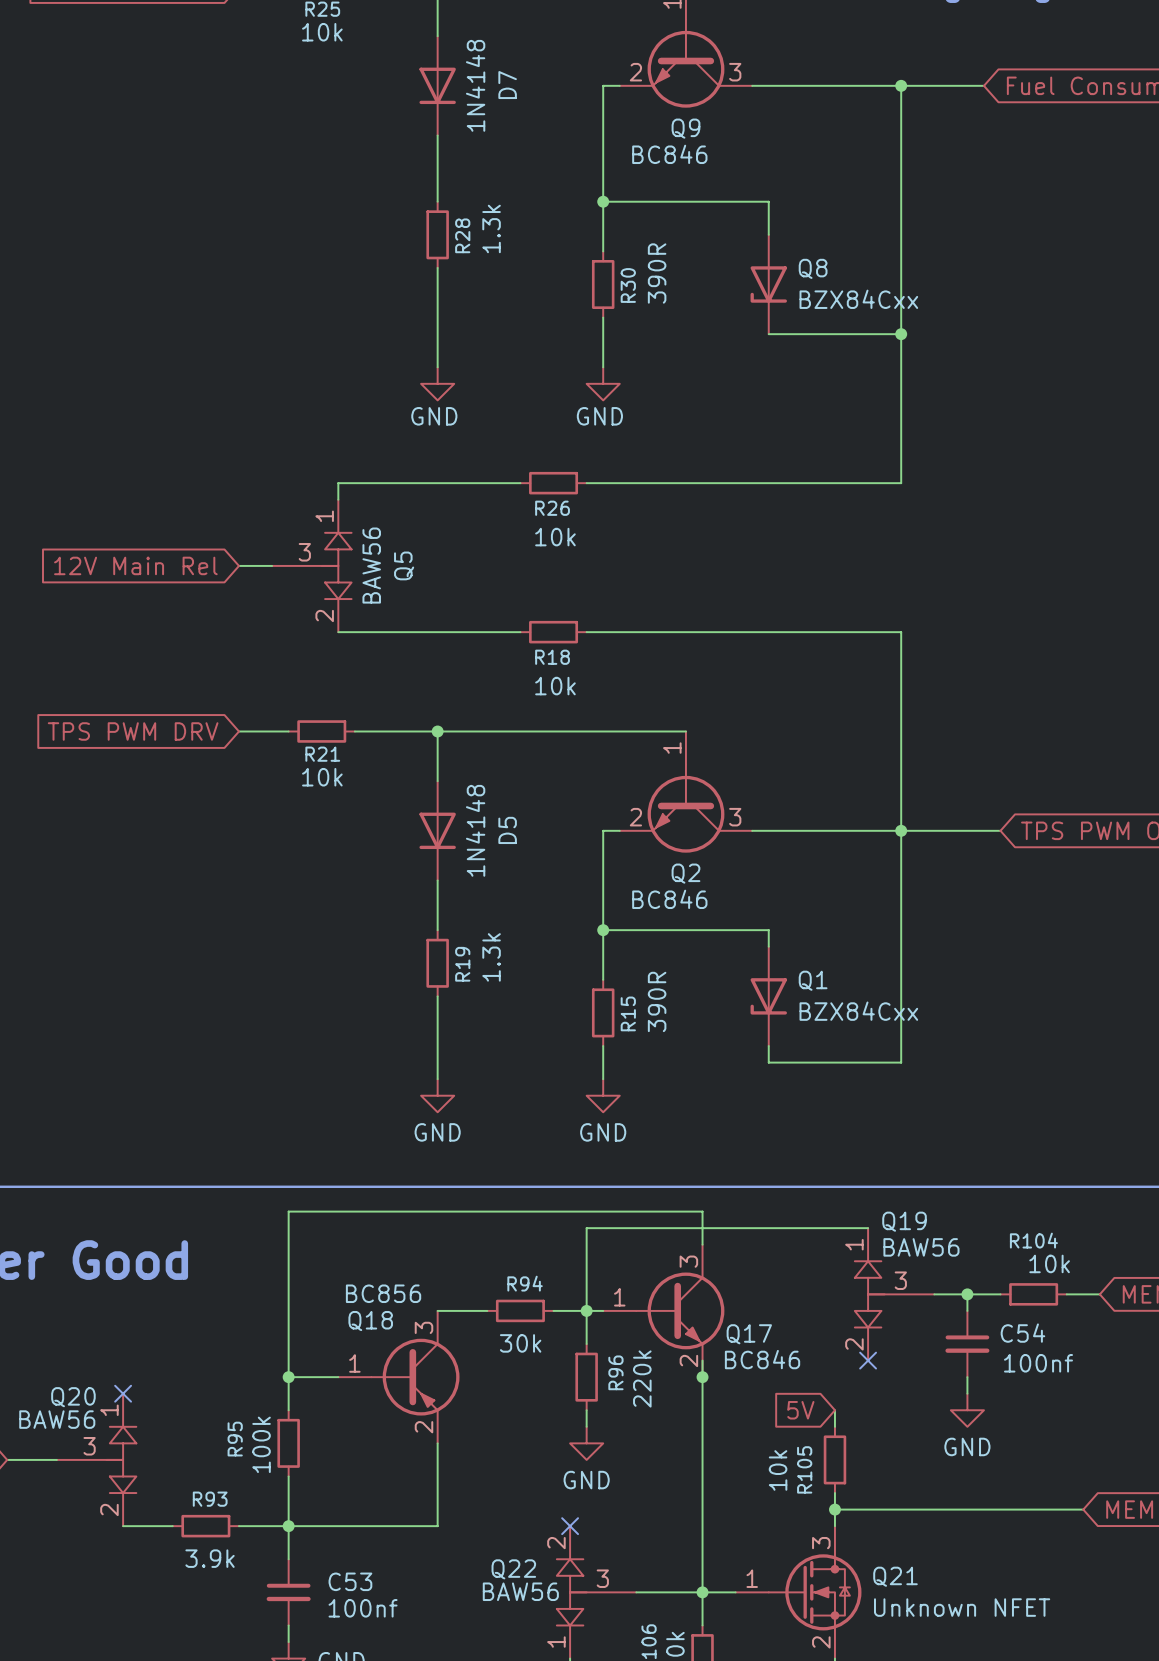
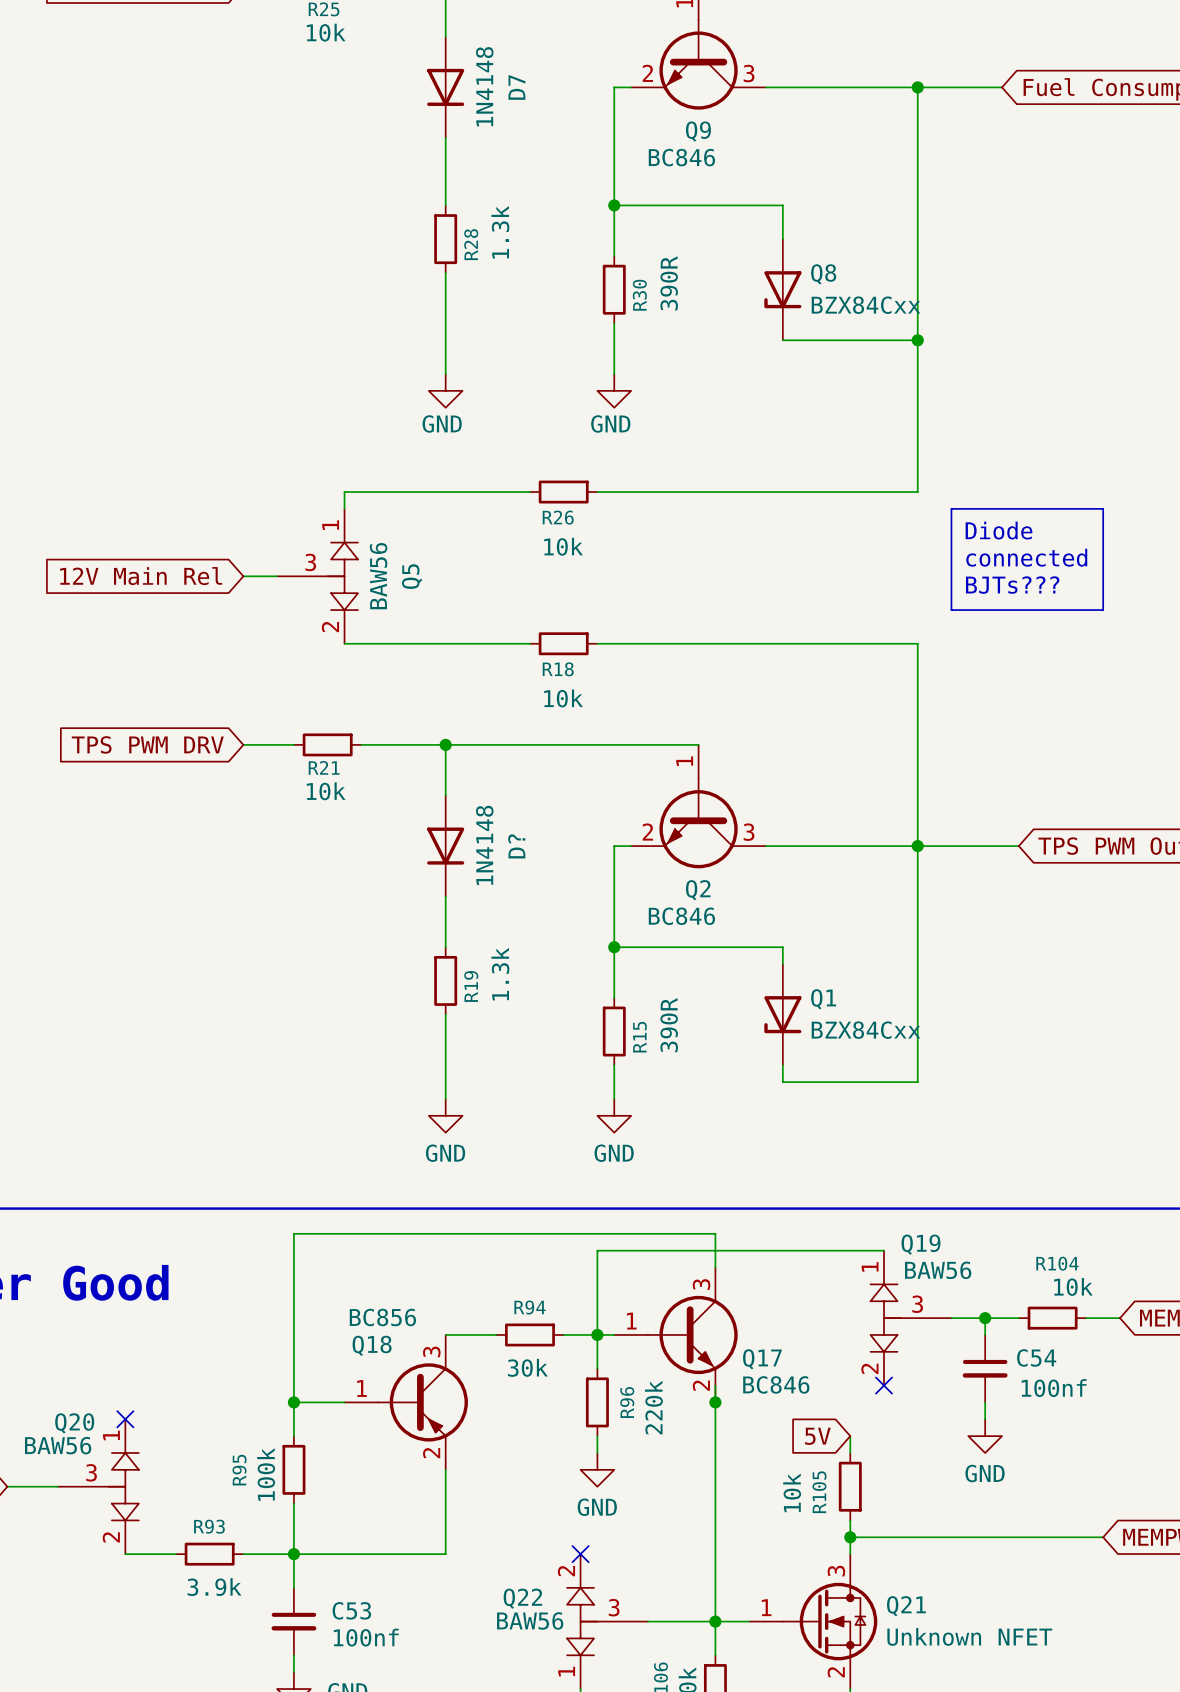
line: none -> (951, 508) (1103, 508) (1103, 610) (951, 610) (951, 508)
text: none -> Diode (998, 530)
text: none -> connected (1026, 557)
text: none -> BJTs??? (1012, 585)
D5 name: D5 (507, 830) -> D? (516, 846)

